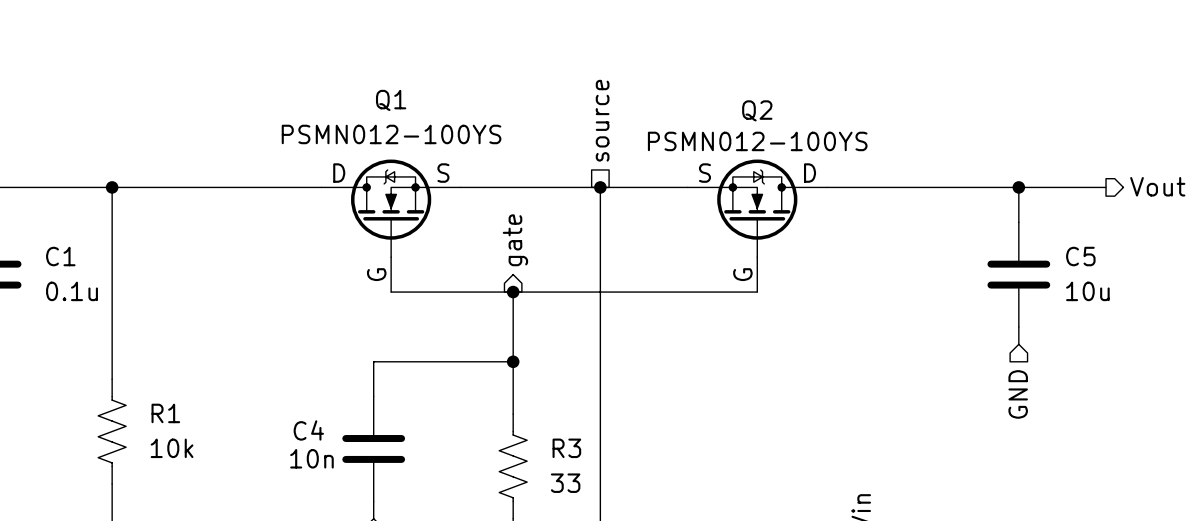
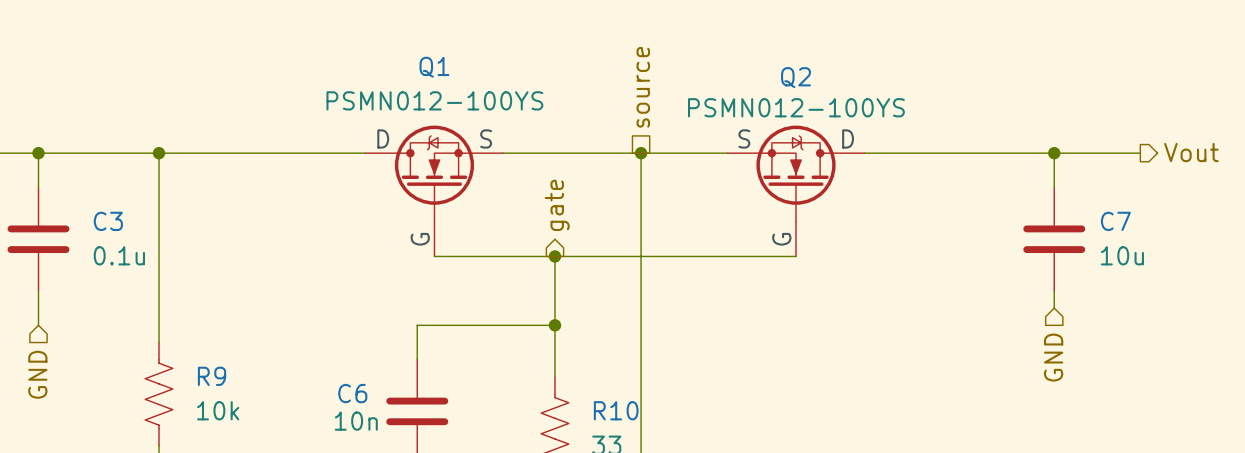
C1 name: C1 (60, 256) -> C3 (108, 221)
C5 name: C5 (1080, 256) -> C7 (1115, 221)
R1 name: R1 (165, 413) -> R9 (212, 376)
C4 name: C4 (308, 430) -> C6 (352, 393)
R3 name: R3 (566, 448) -> R10 (616, 410)

